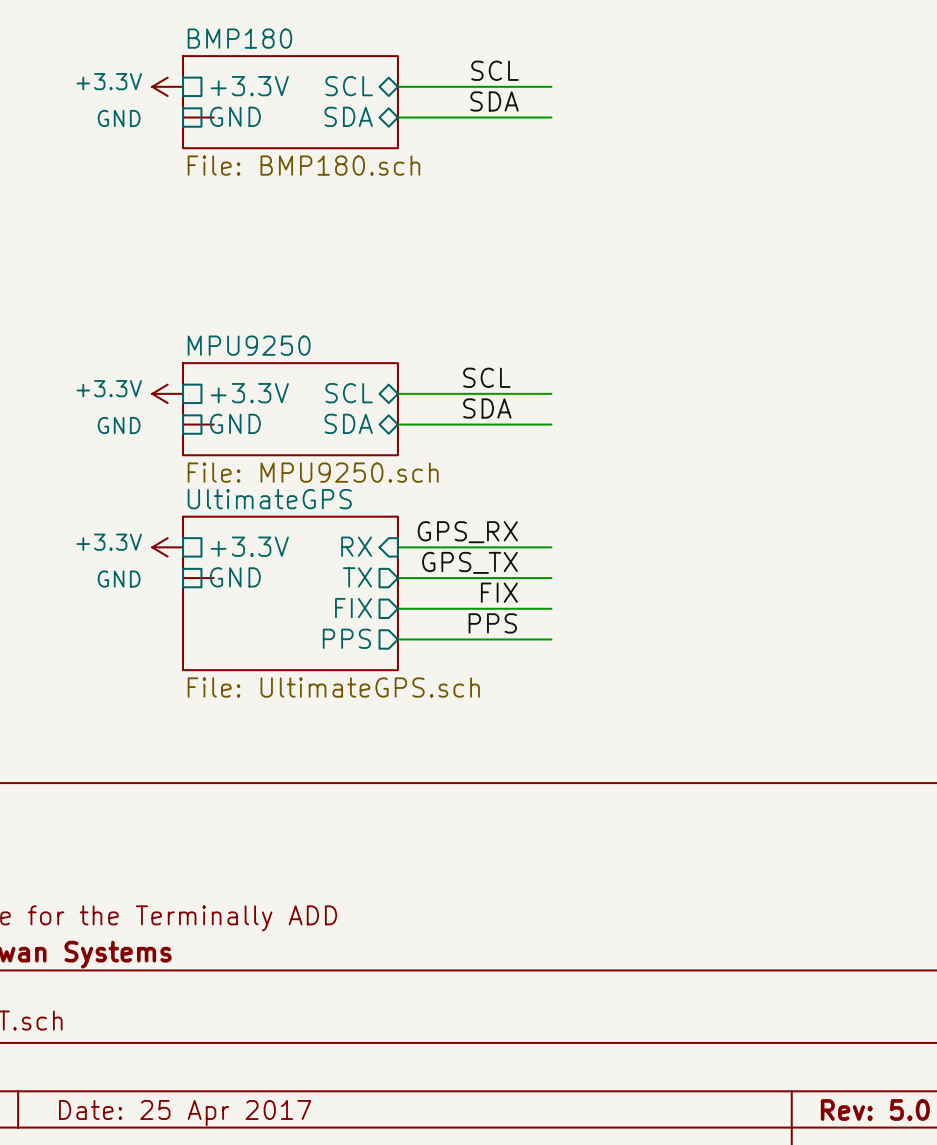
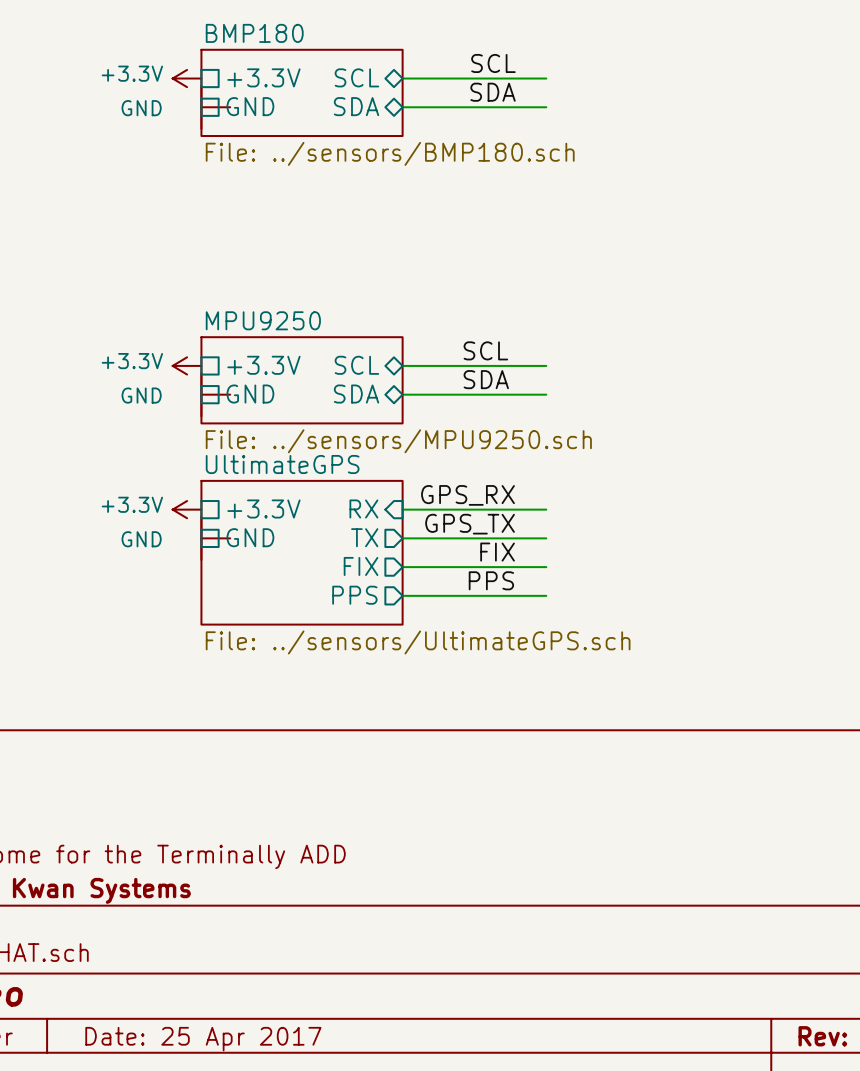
sheet BMP180 value: File: BMP180.sch (303, 165) -> File: ../sensors/BMP180.sch (390, 153)
sheet MPU9250 value: File: MPU9250.sch (313, 472) -> File: ../sensors/MPU9250.sch (398, 441)
sheet UltimateGPS value: File: UltimateGPS.sch (333, 687) -> File: ../sensors/UltimateGPS.sch (418, 642)

